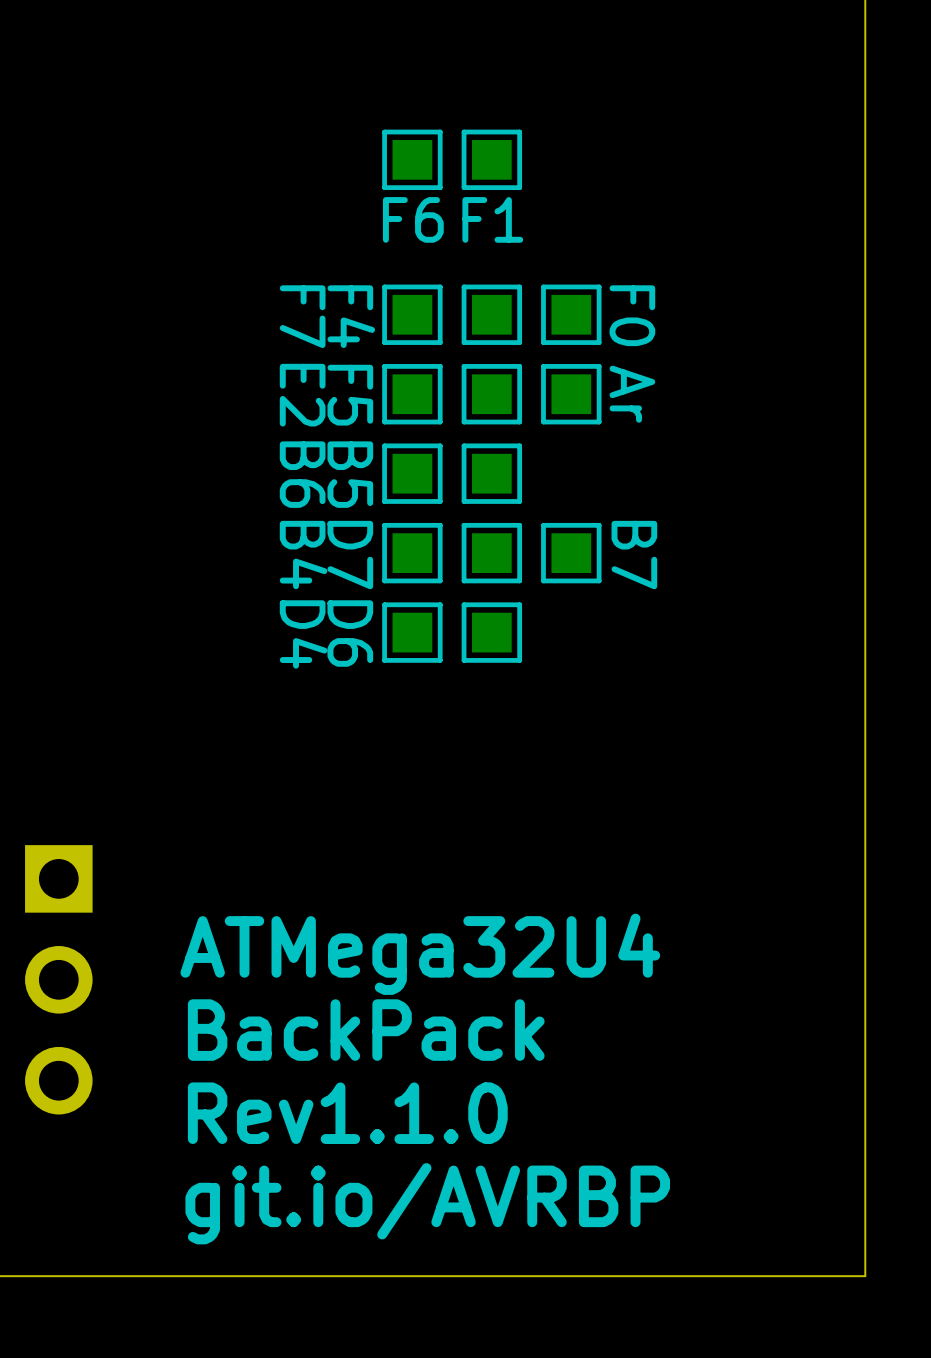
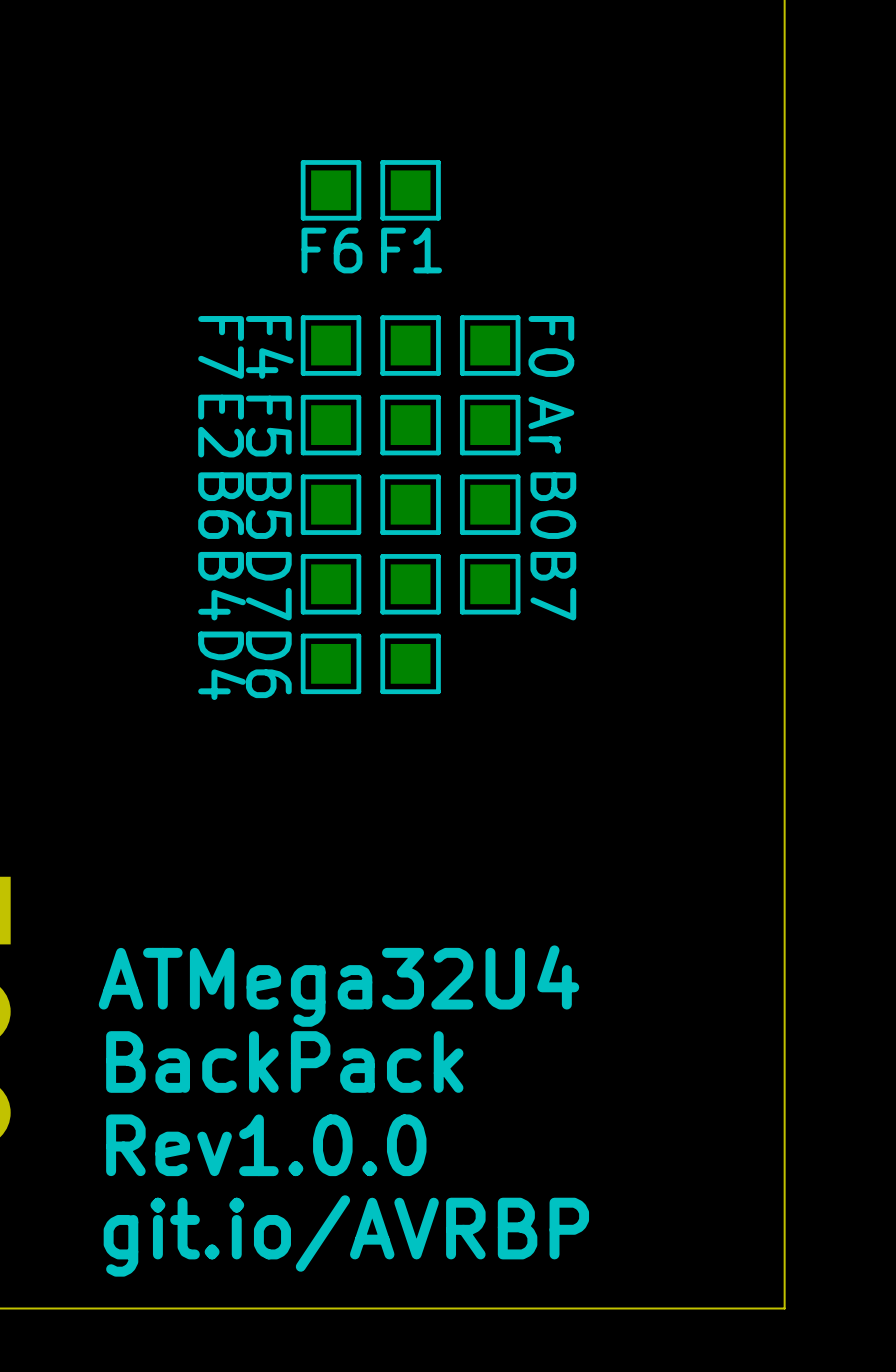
part: none -> B0 (490, 504)
text: Rev1.1.0 (347, 1113) -> Rev1.0.0 (266, 1145)

